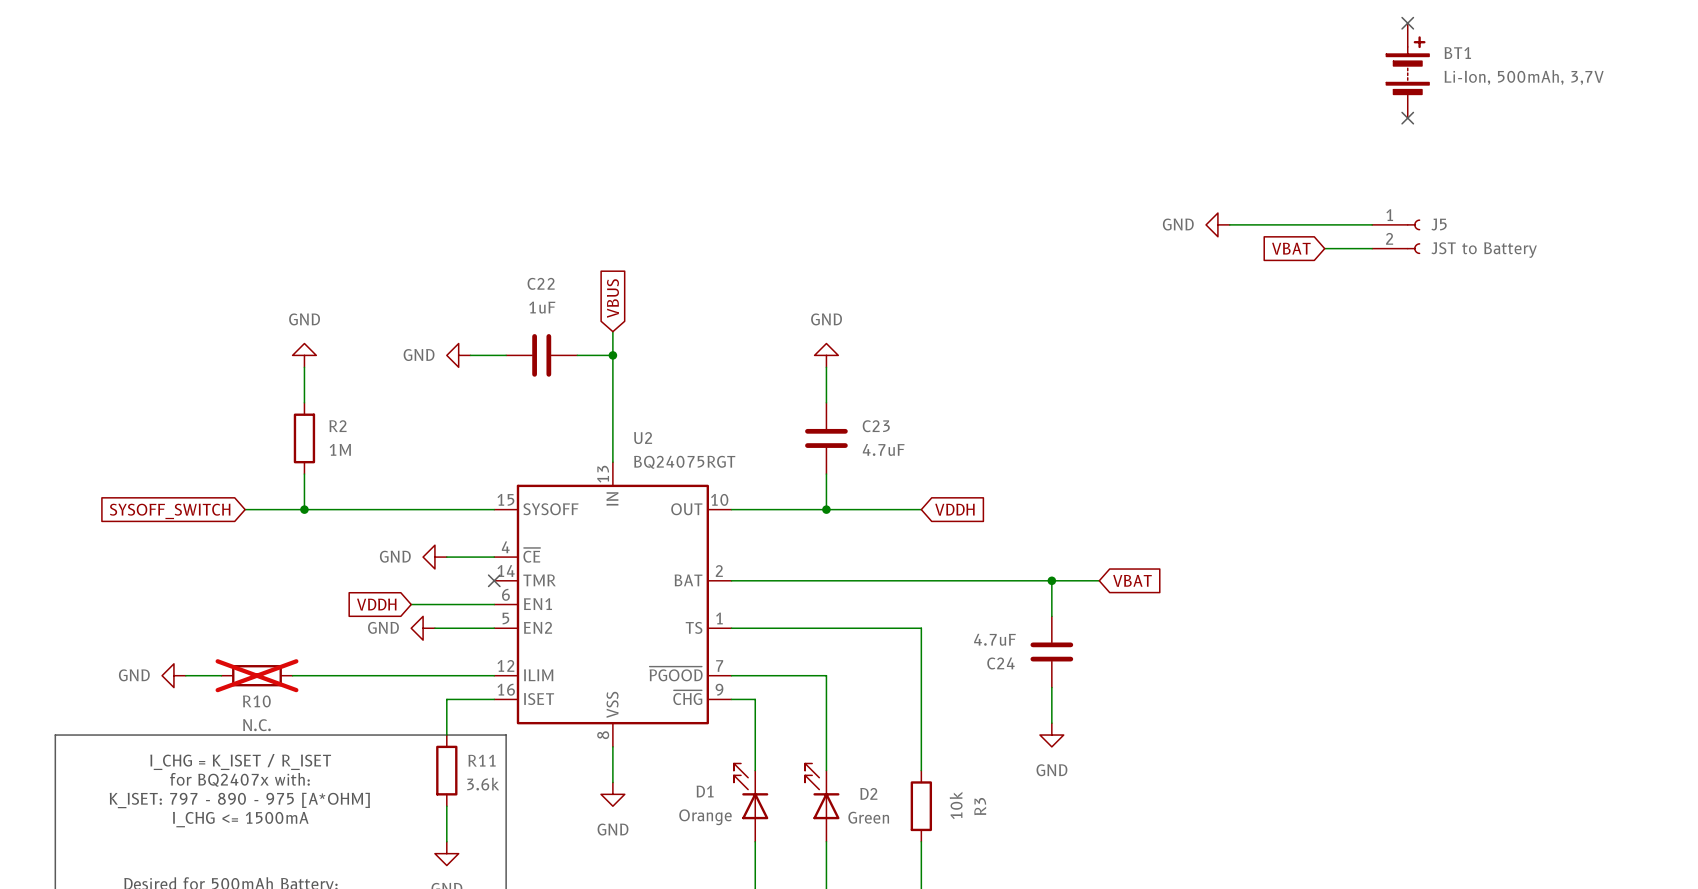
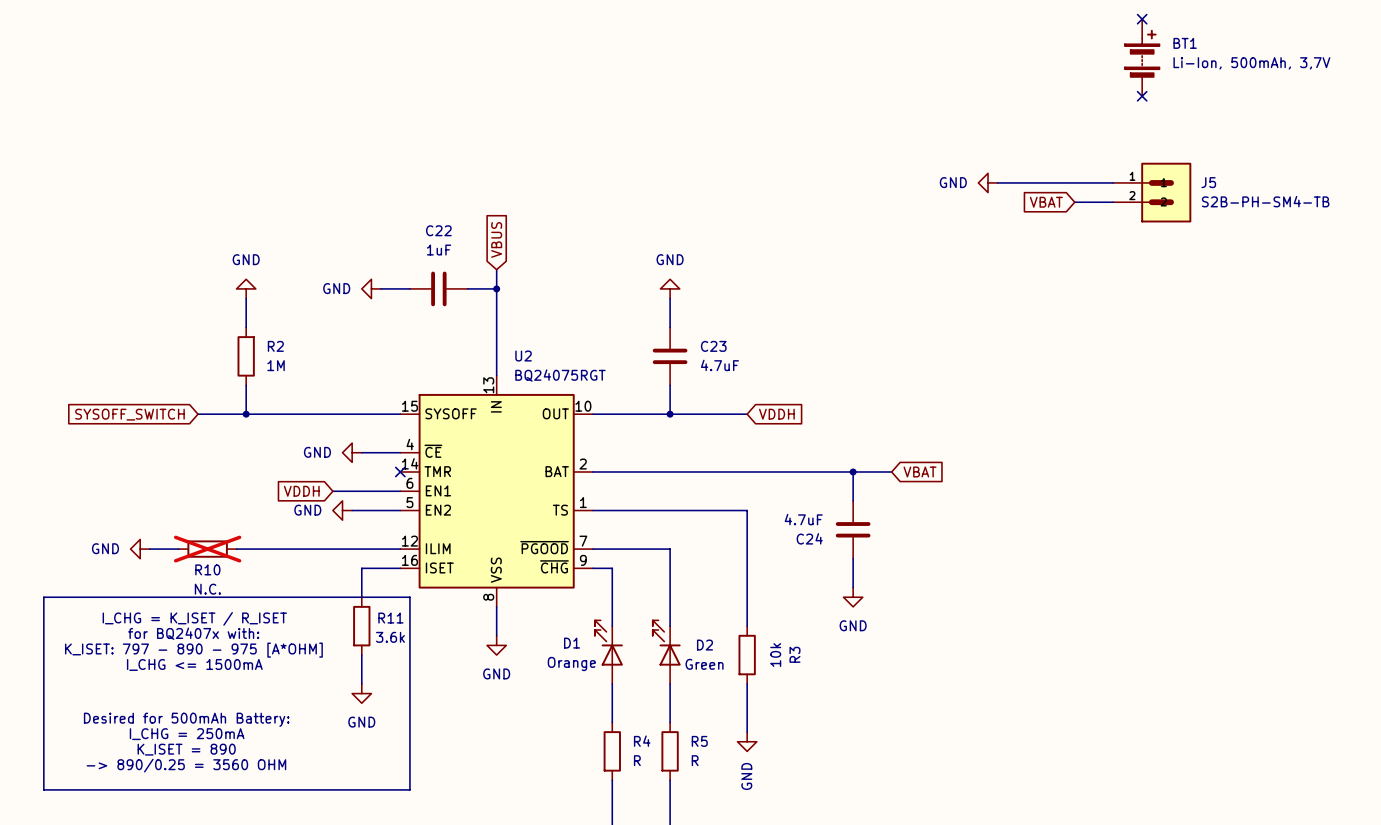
J5 symbol: [1372, 219, 1421, 255] -> [1113, 162, 1192, 223]
J5 name position: J5 (1439, 224) -> J5 (1208, 182)
J5 value: JST to Battery (1484, 250) -> S2B-PH-SM4-TB (1265, 201)

